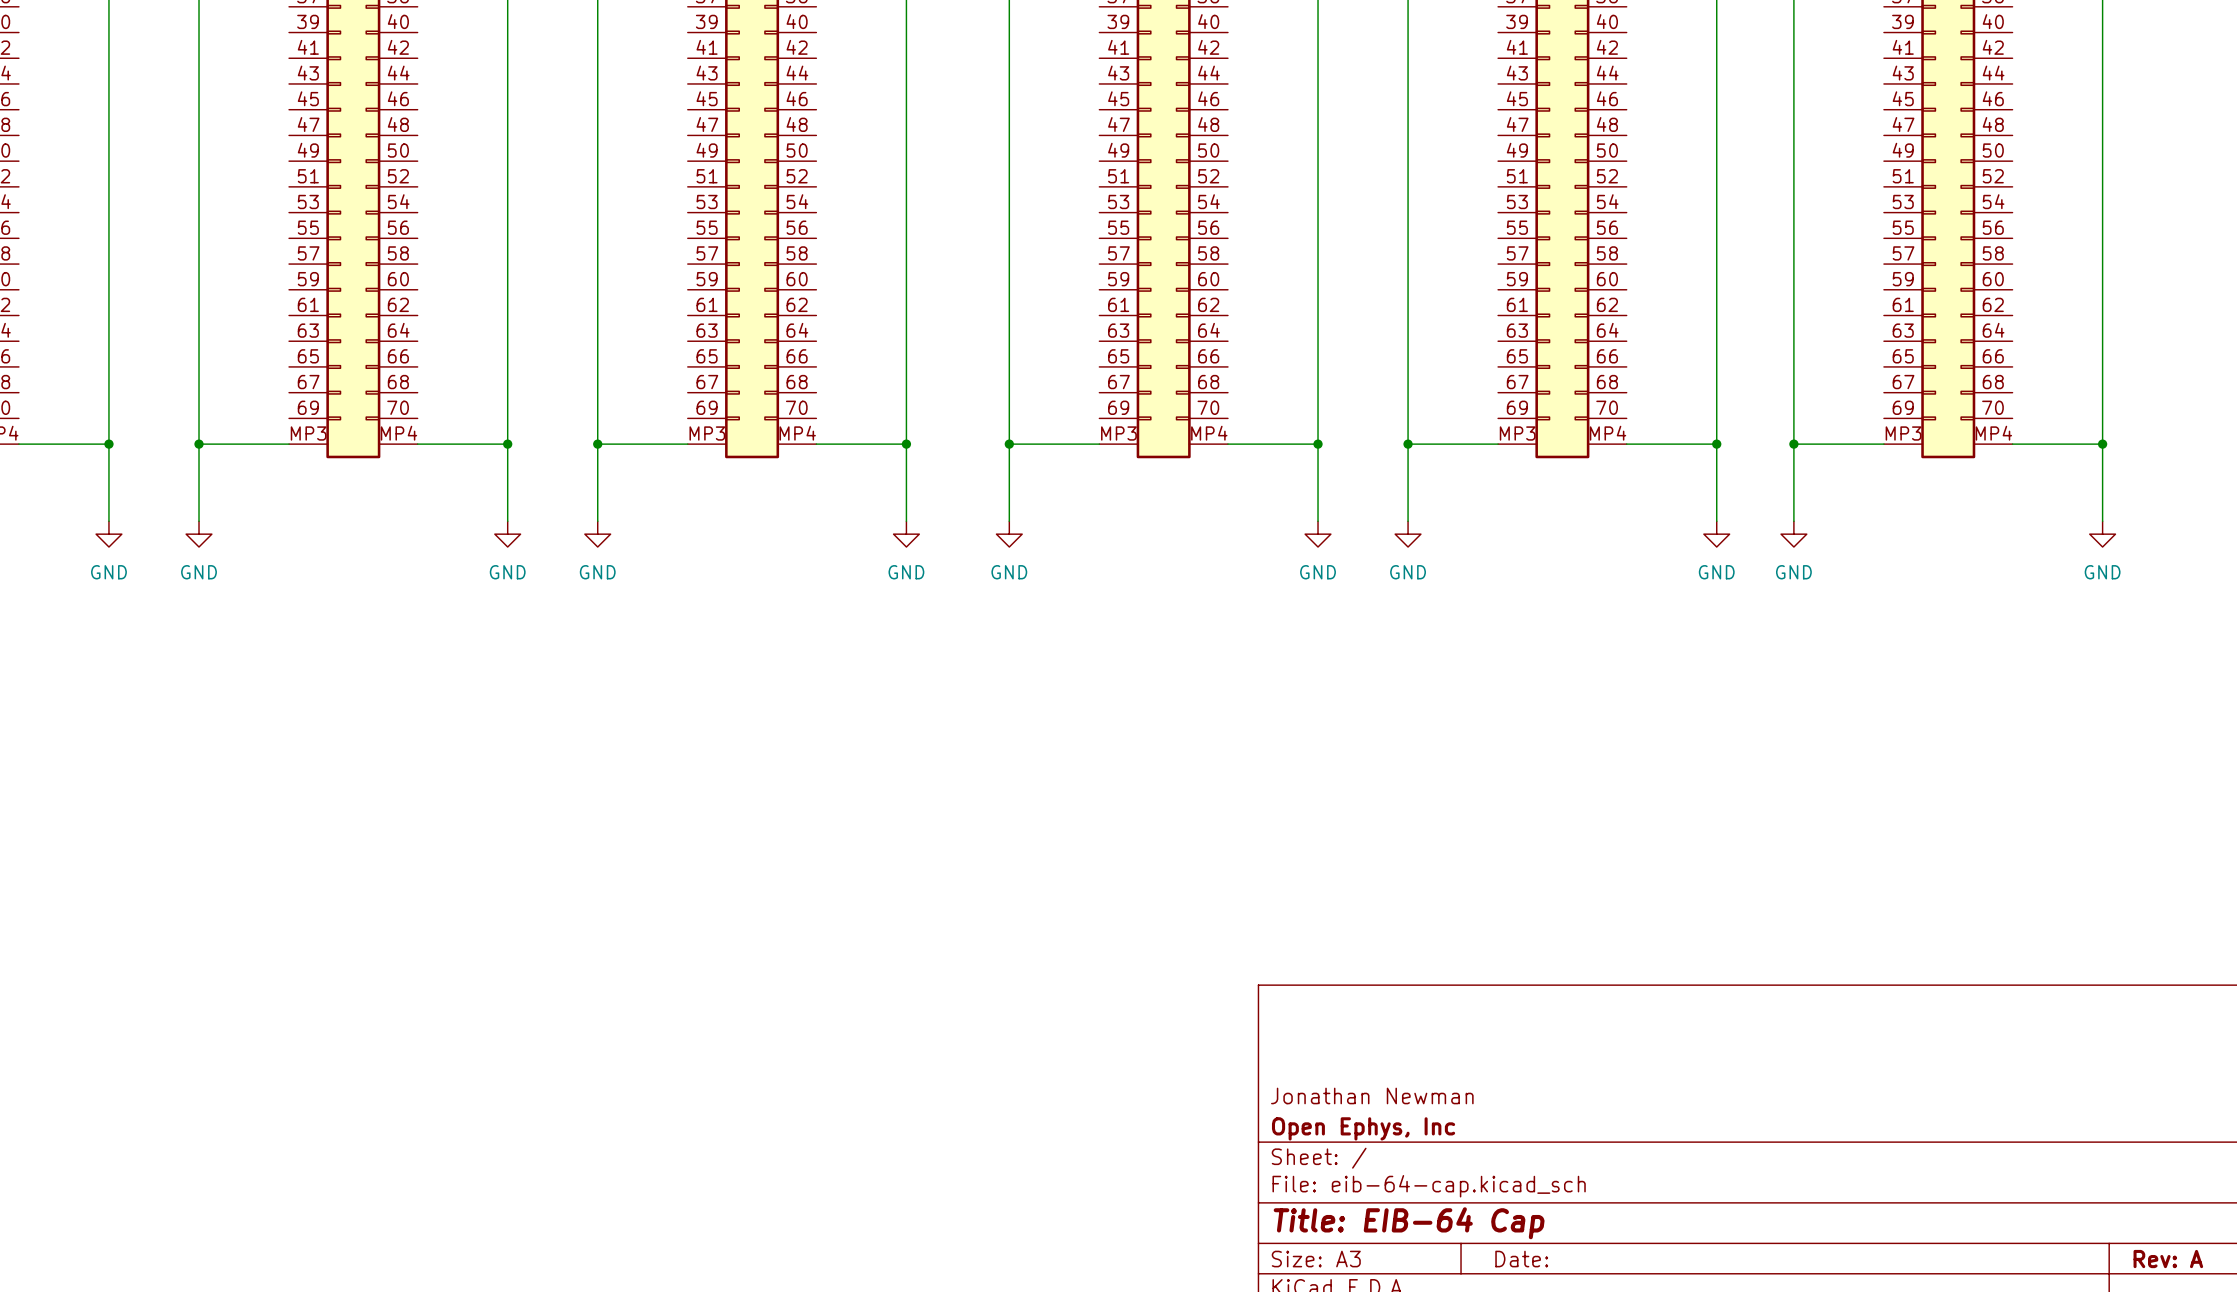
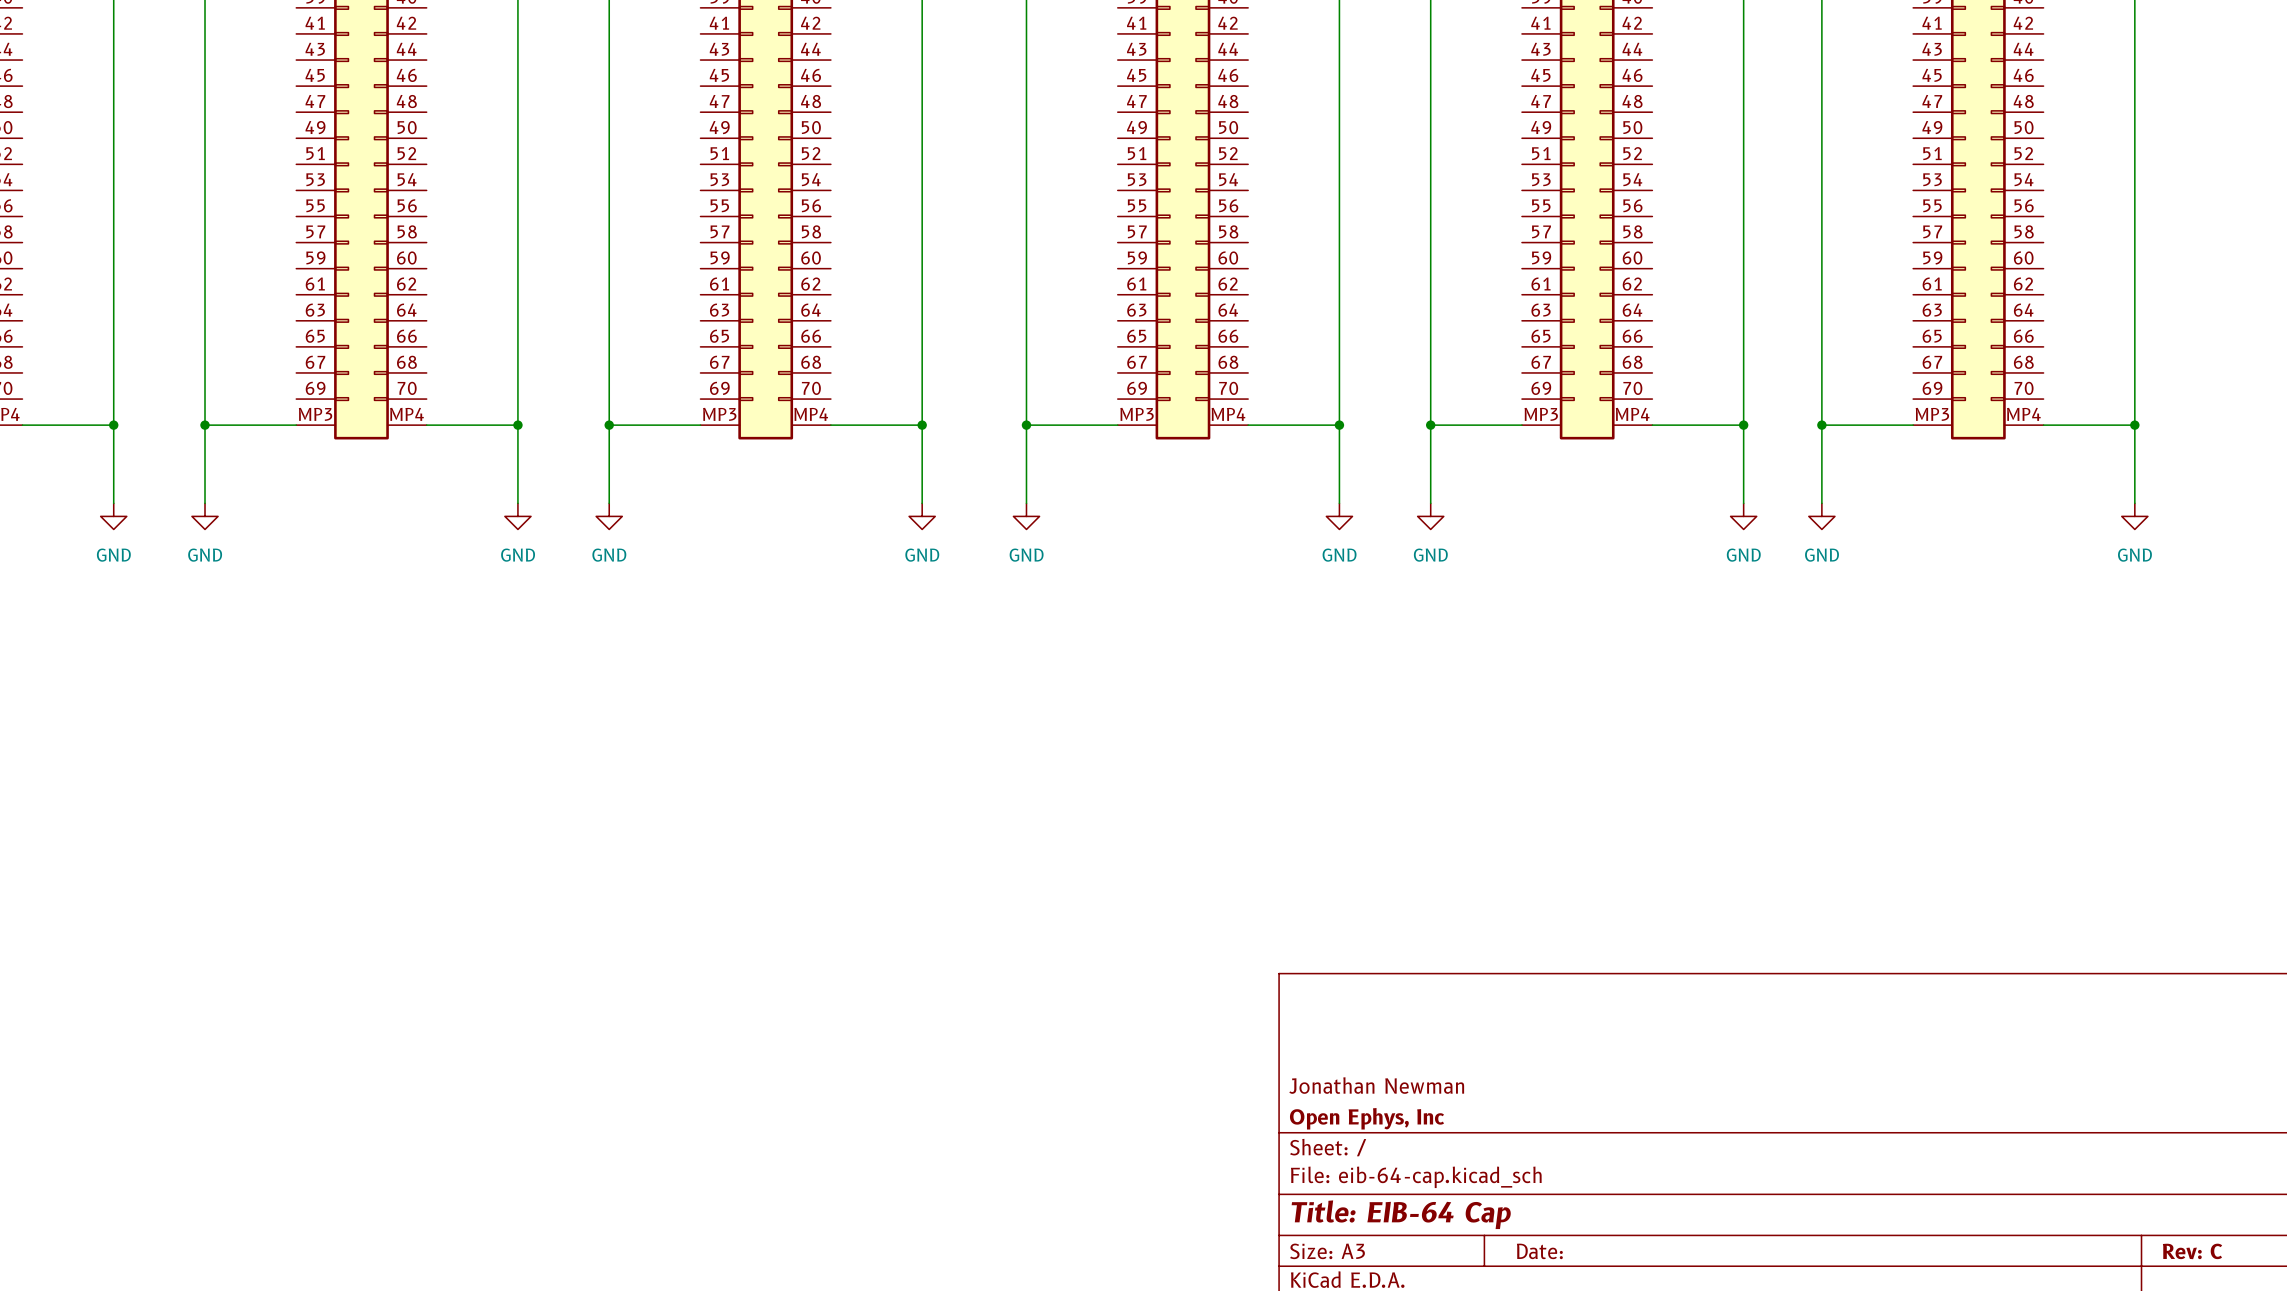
title block: Rev: A (2168, 1259) -> Rev: C (2192, 1251)

